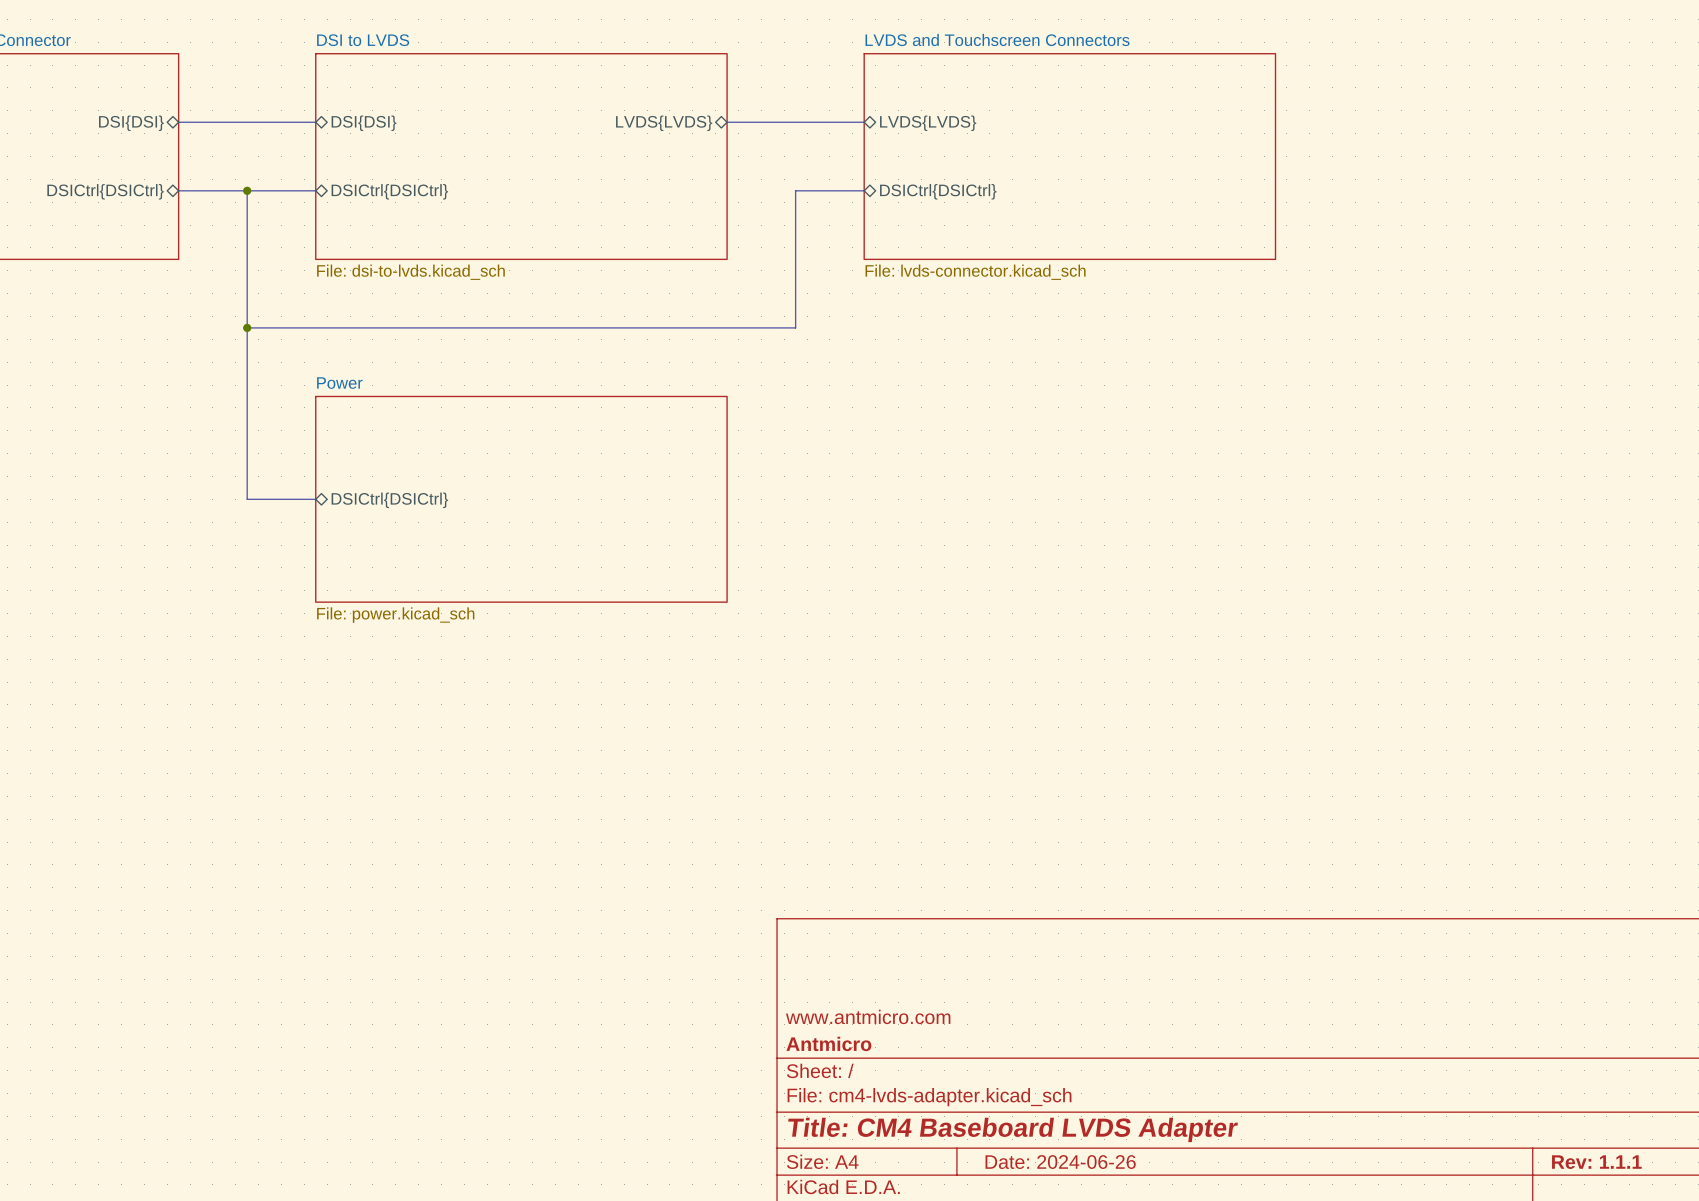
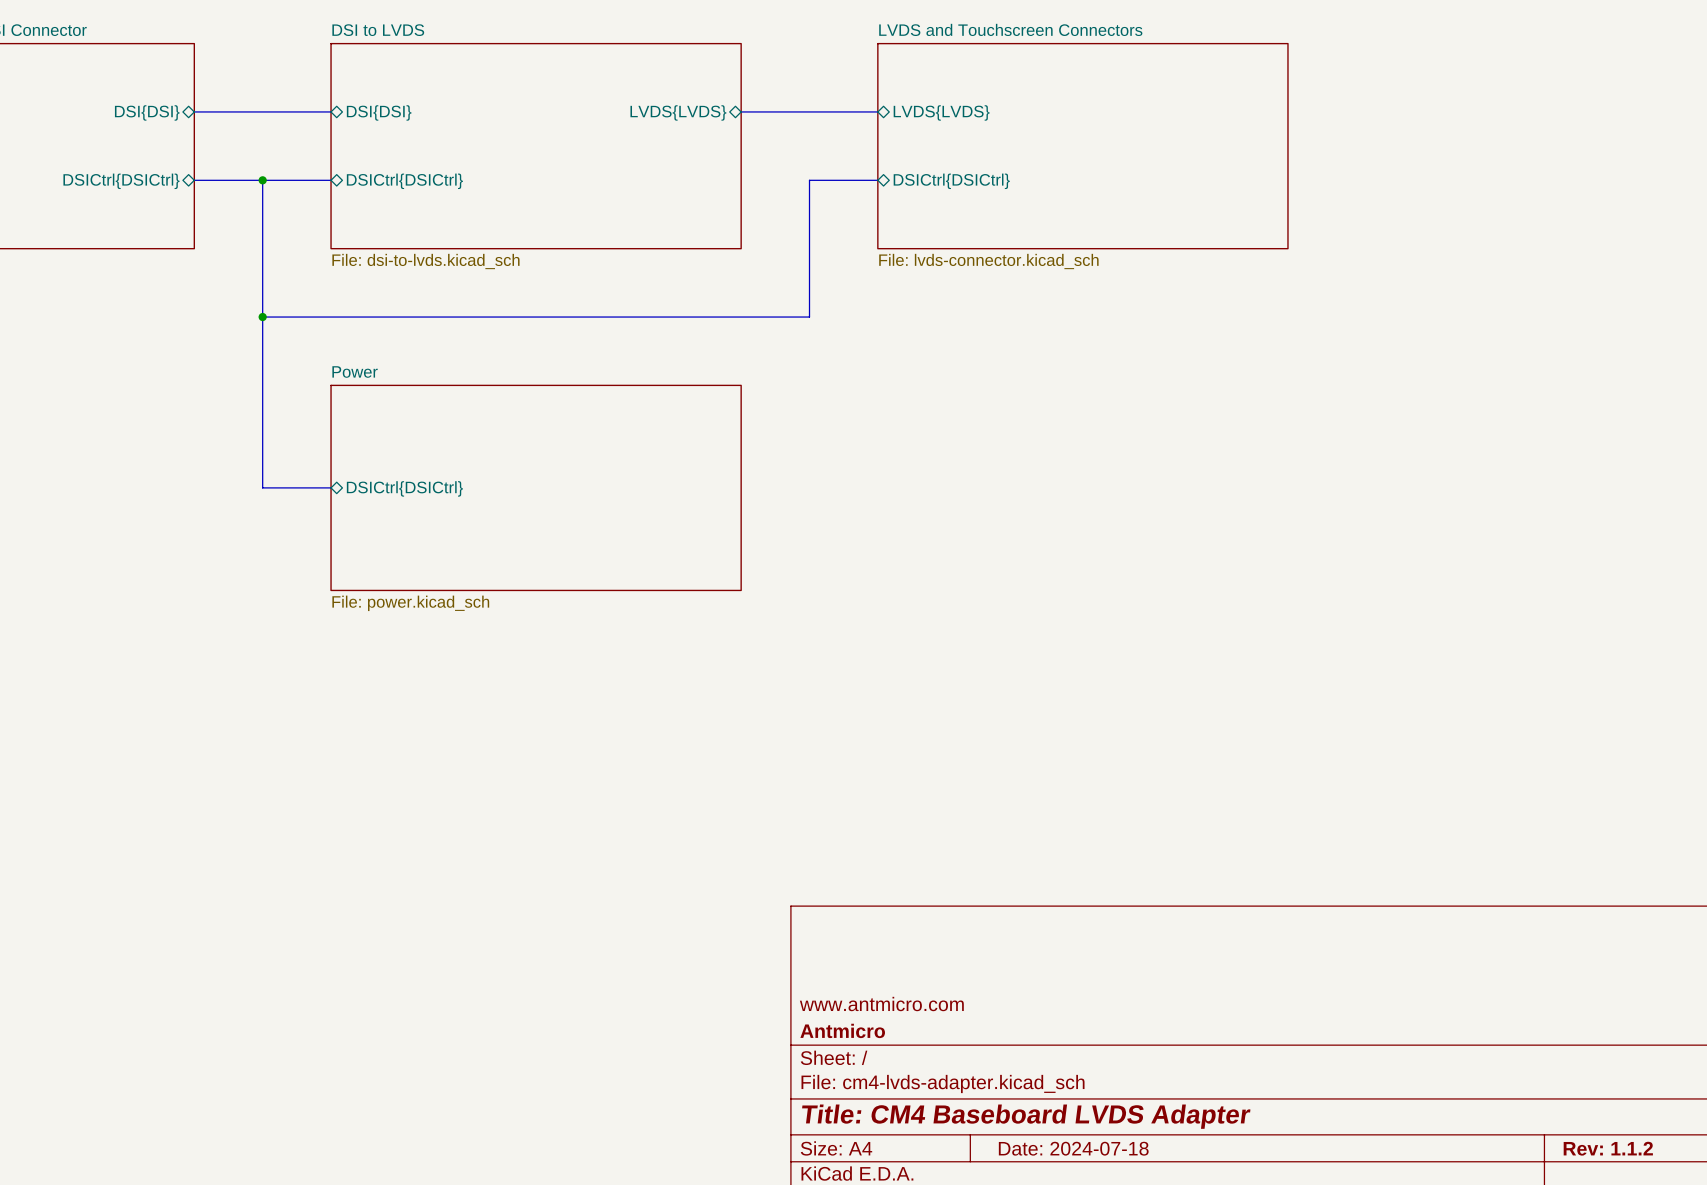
title block: Date: 2024-06-26 (1060, 1162) -> Date: 2024-07-18 (1073, 1148)
title block: Rev: 1.1.1 (1596, 1162) -> Rev: 1.1.2 (1608, 1148)

